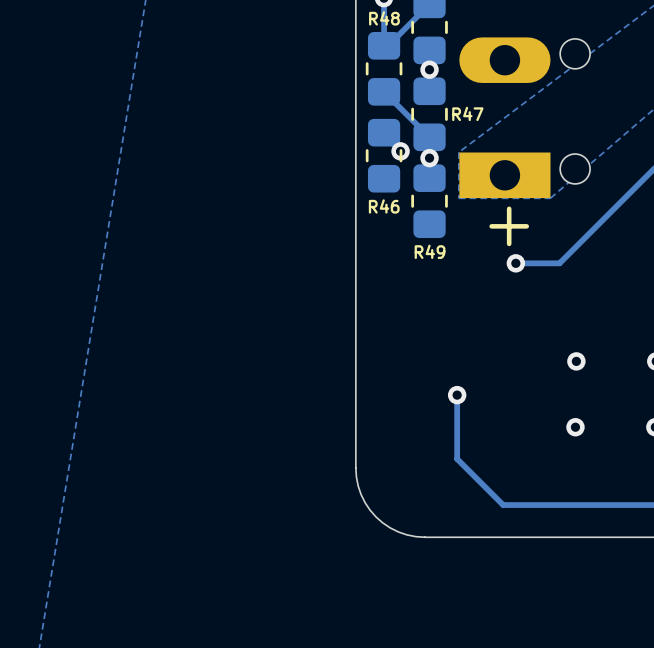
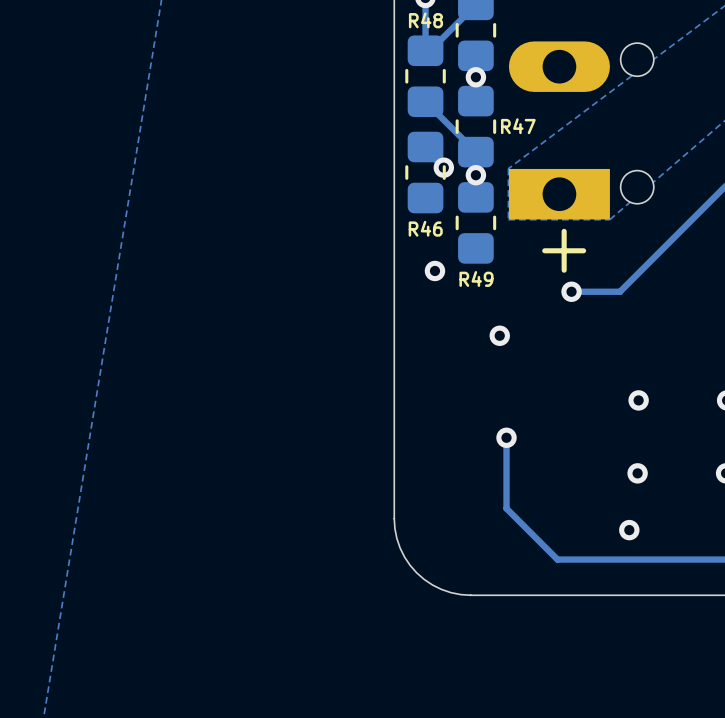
via: none -> (434, 270)
via: none -> (499, 335)
via: none -> (629, 530)

